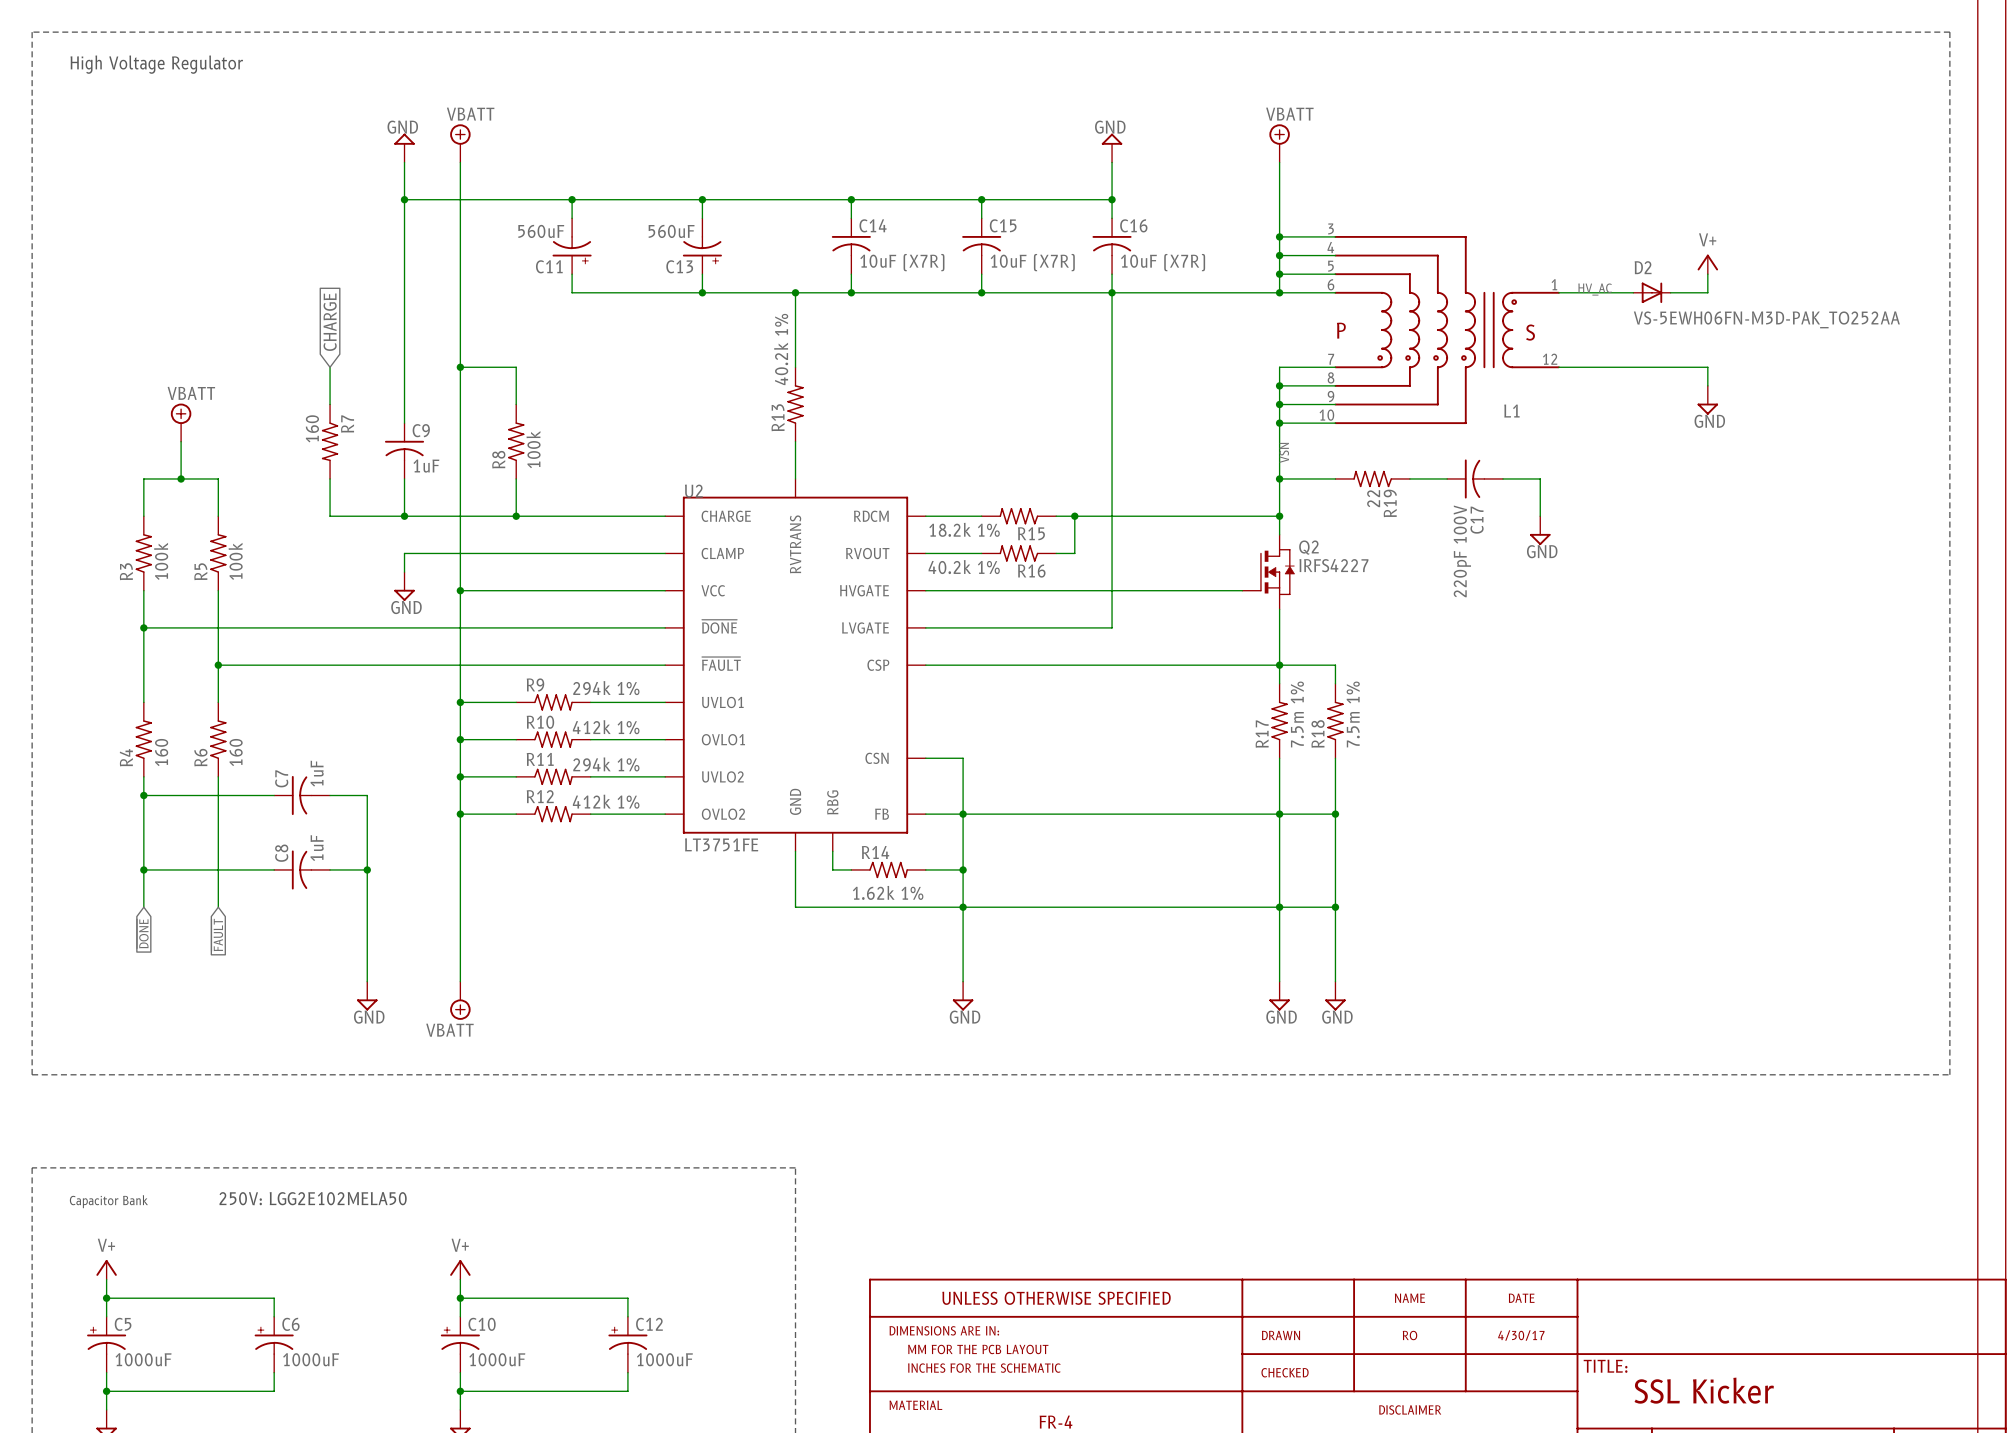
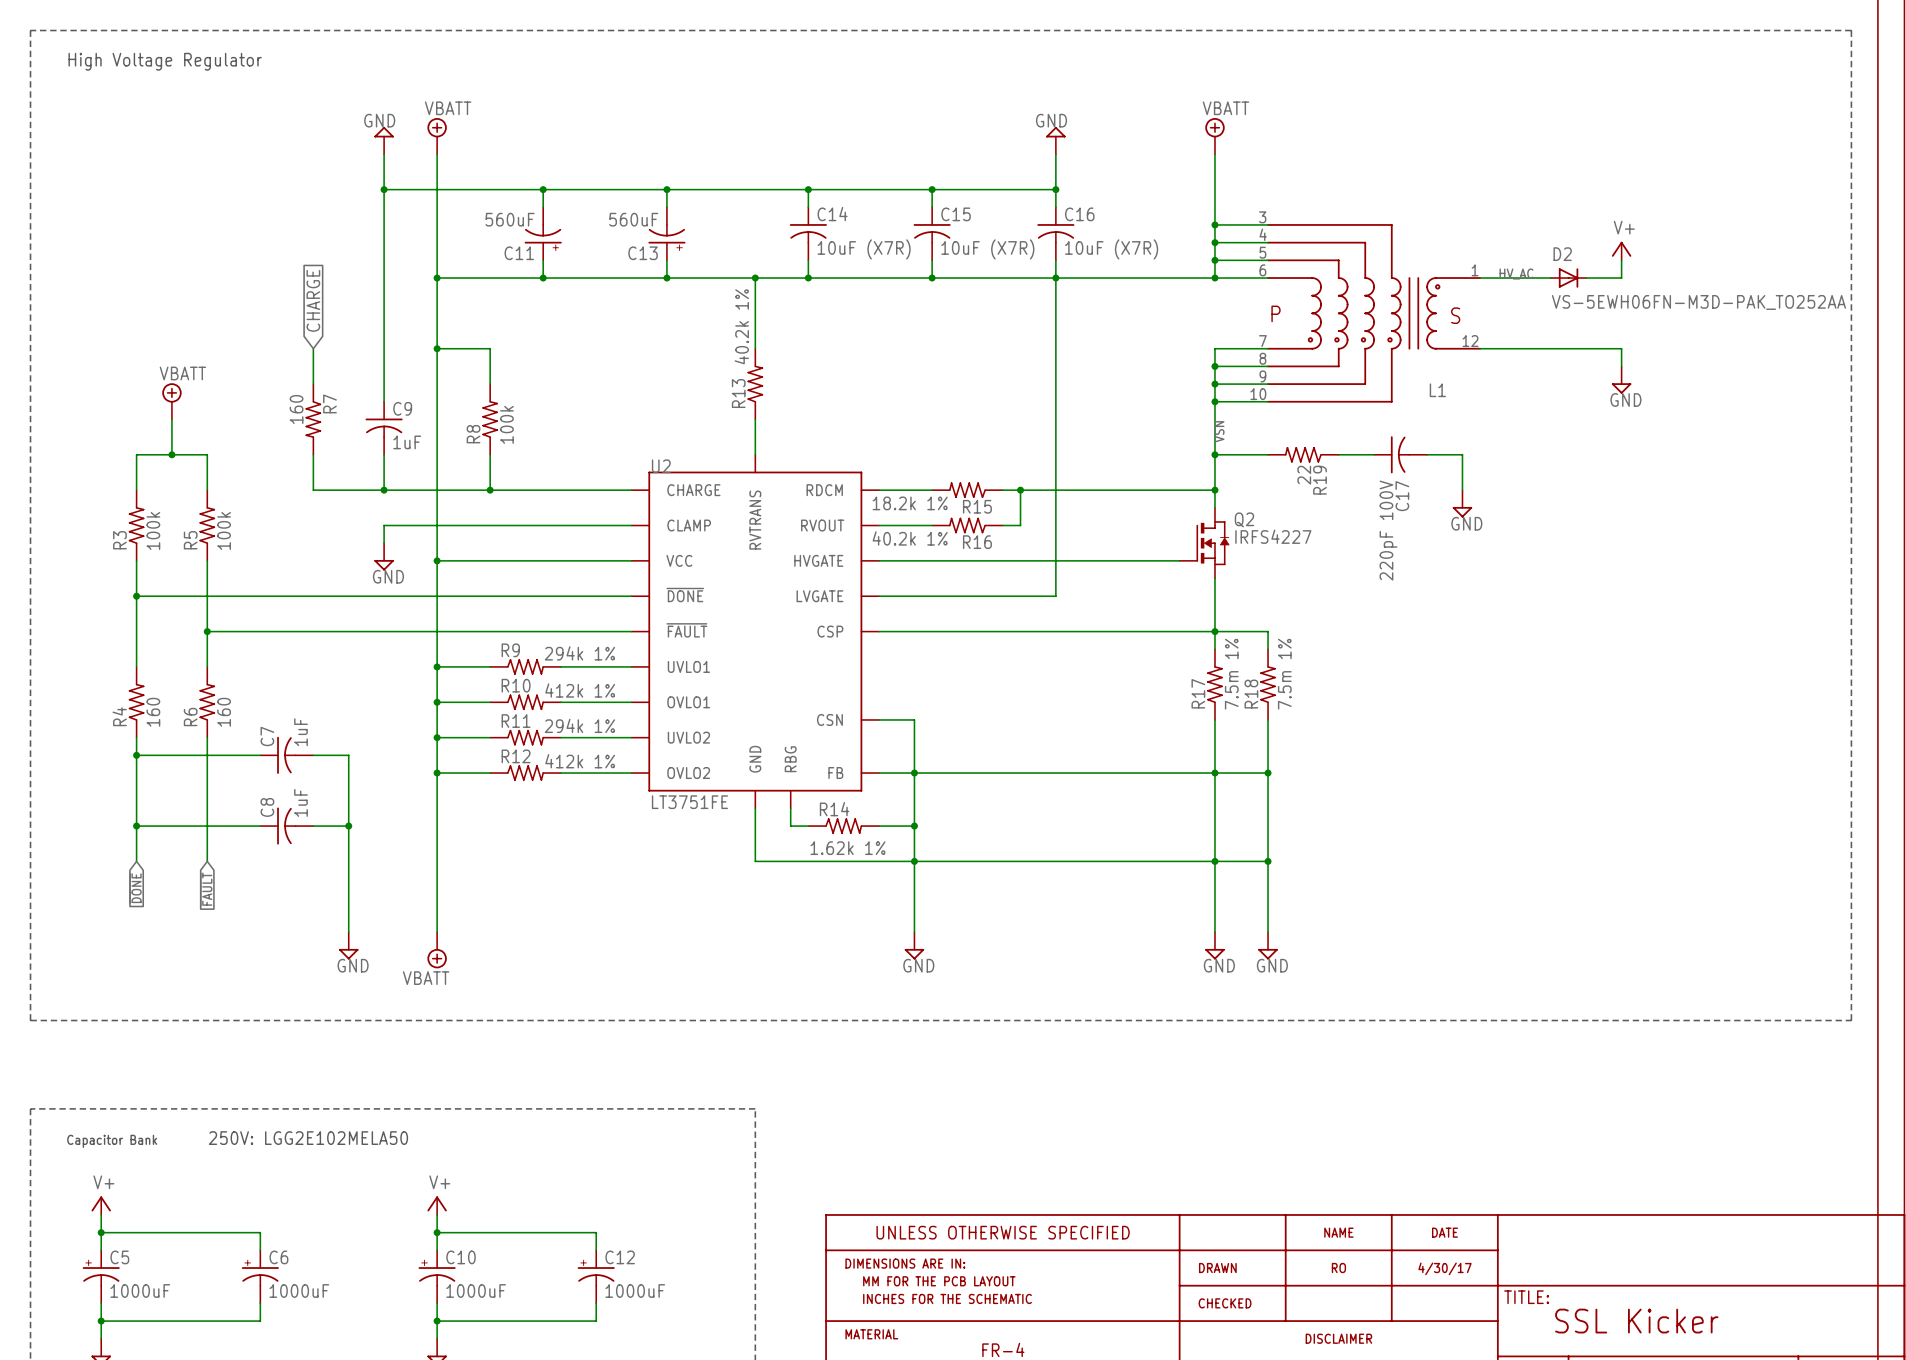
wire: none -> (437, 278) (543, 278)
junction: none -> (437, 278)
junction: none -> (543, 278)

